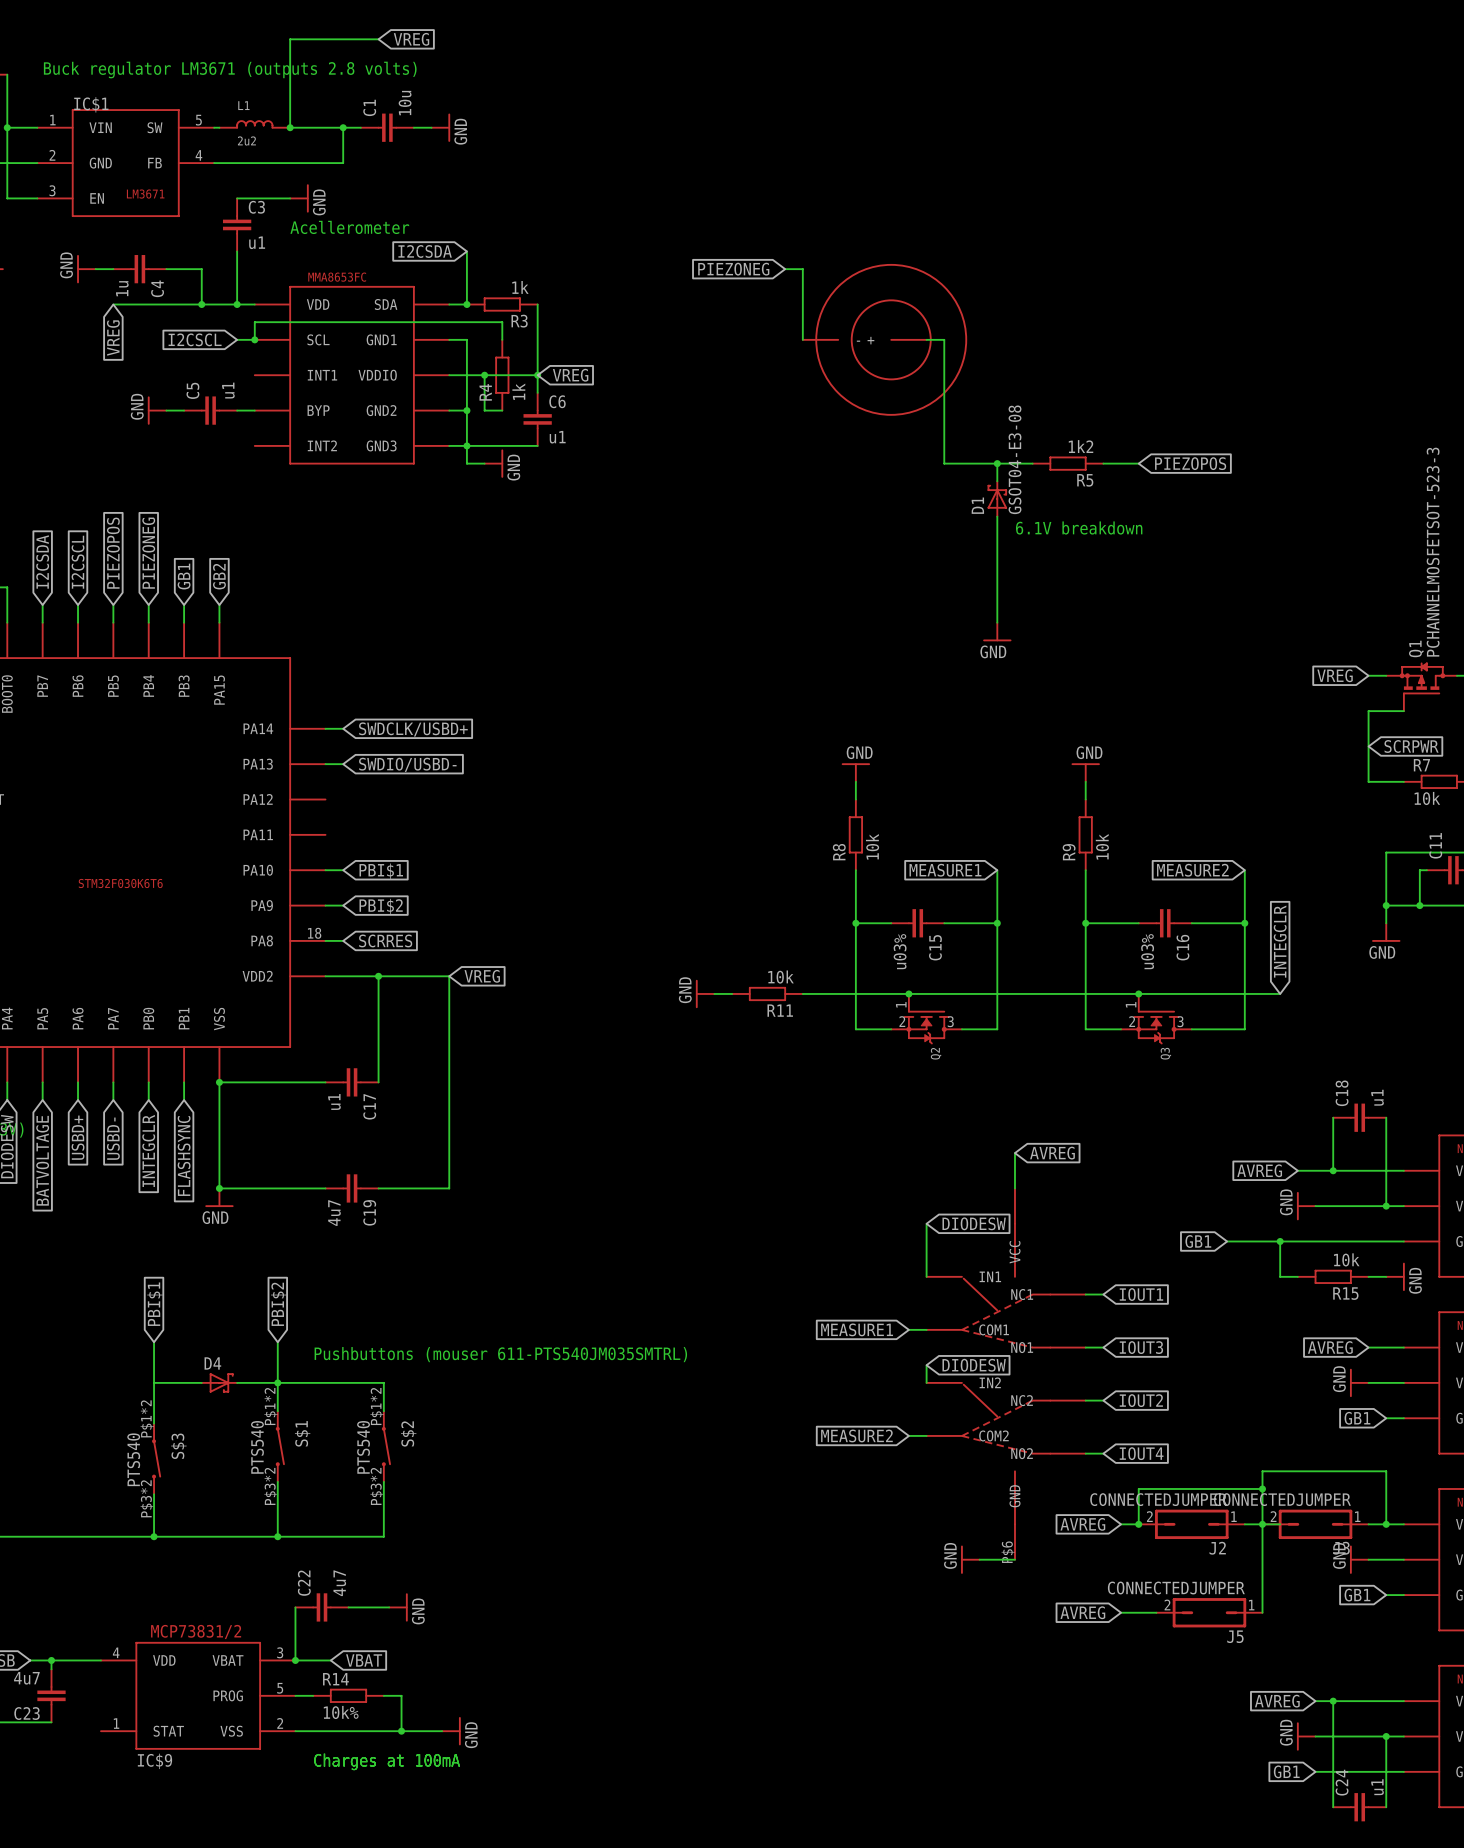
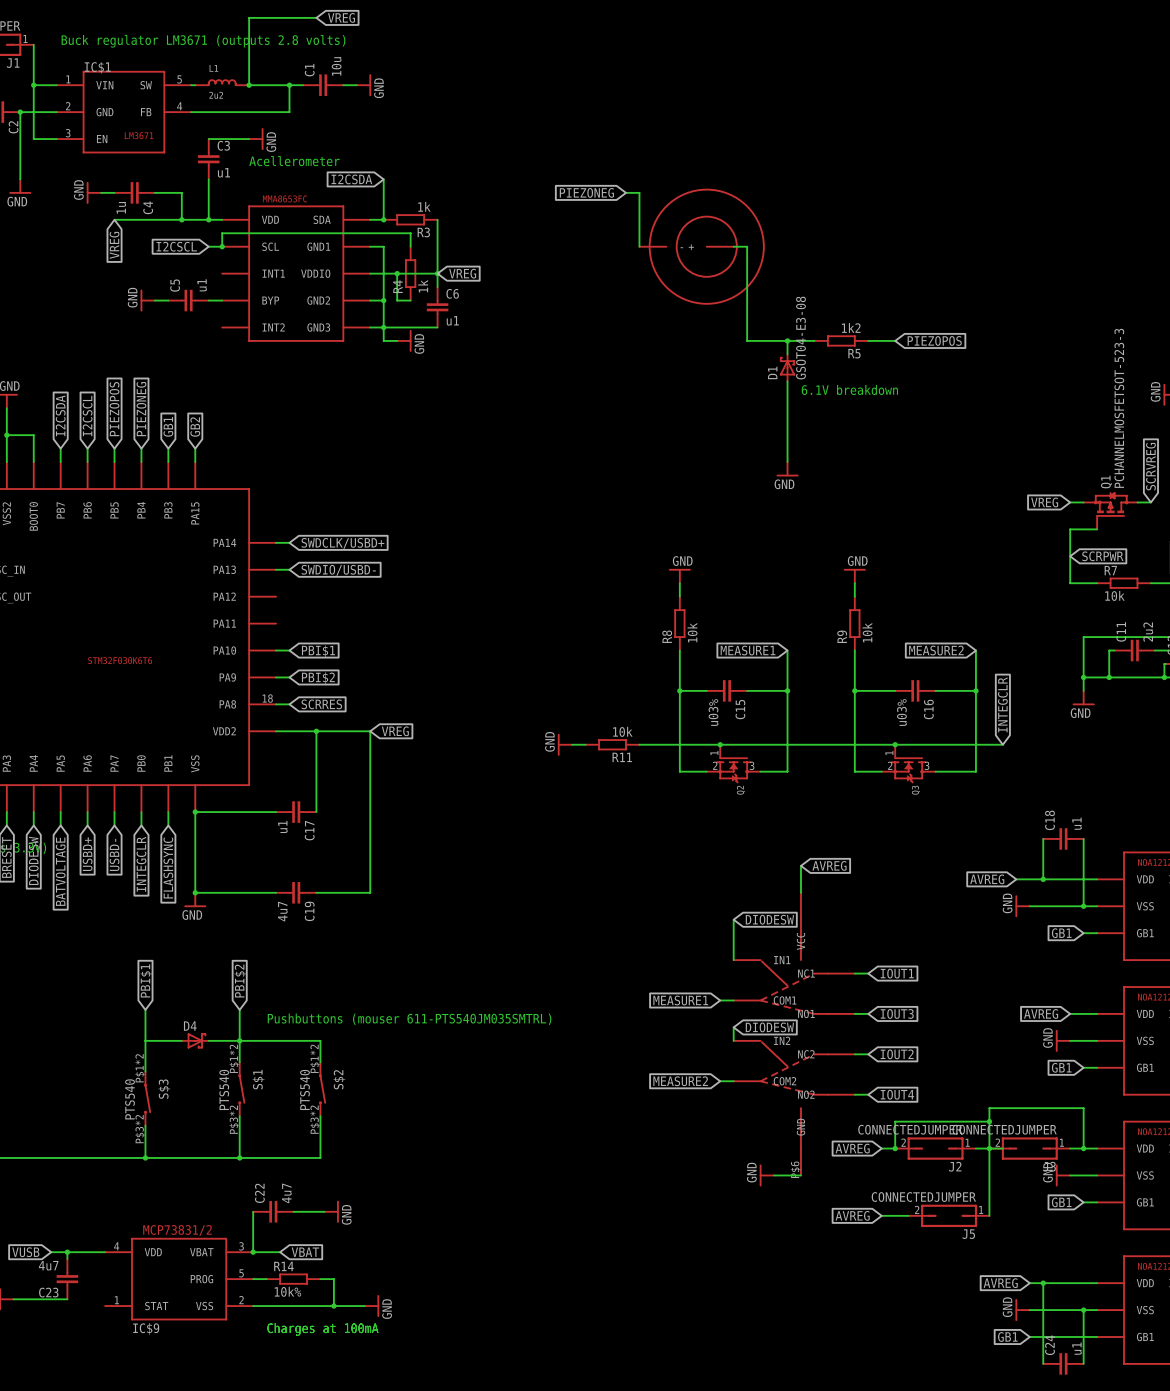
global label position: GB1 (1198, 1241) -> GB1 (1061, 933)
wire: (1227, 1241) (1386, 1241) -> none
wire: (1280, 1241) (1280, 1276) (1297, 1276) -> none
junction: (1280, 1241) -> none
R15: 10k (1333, 1276) -> none
wire: (1368, 1276) (1386, 1276) -> none
power symbol: GND (1395, 1276) -> none

